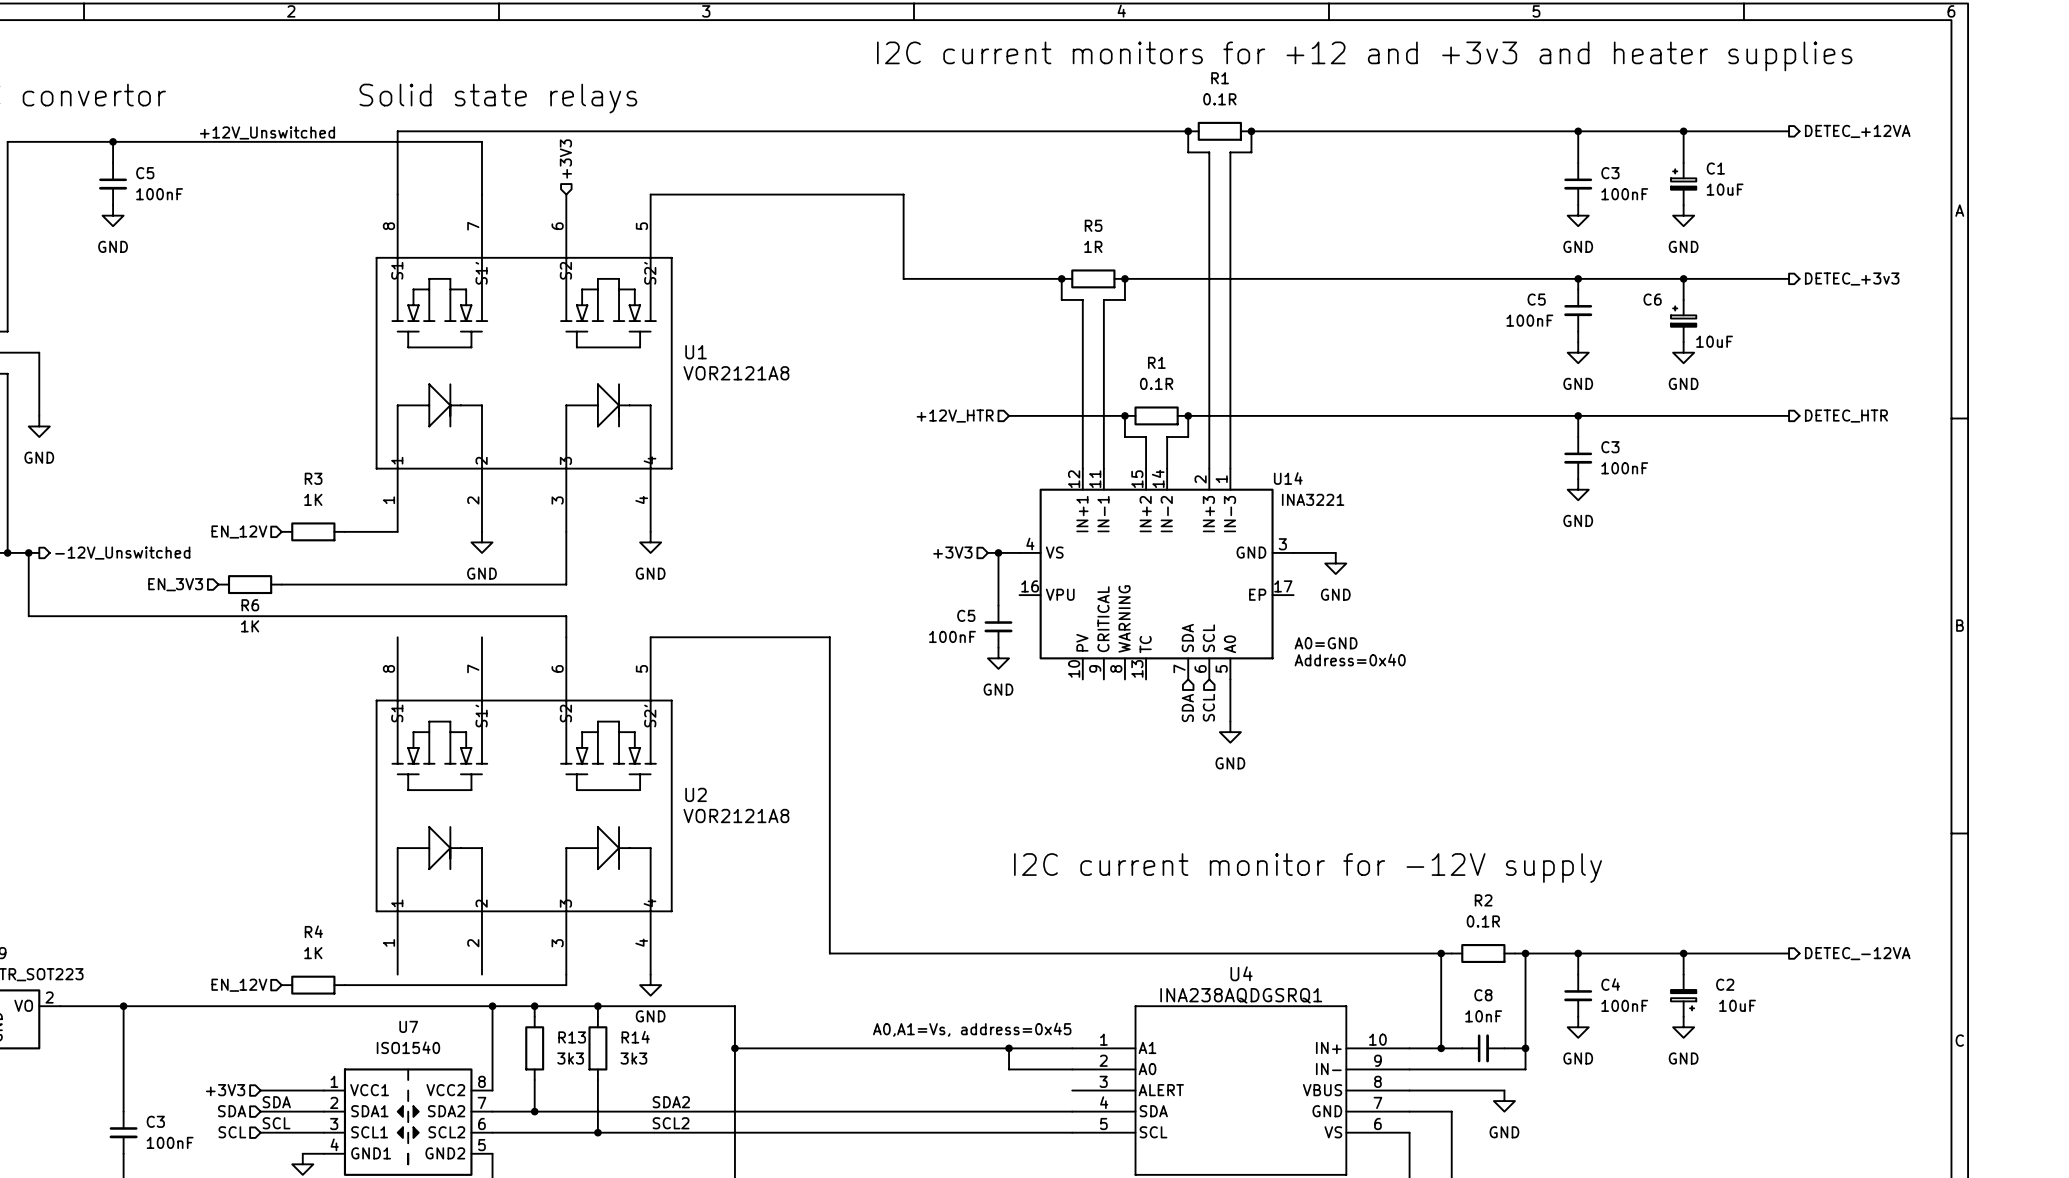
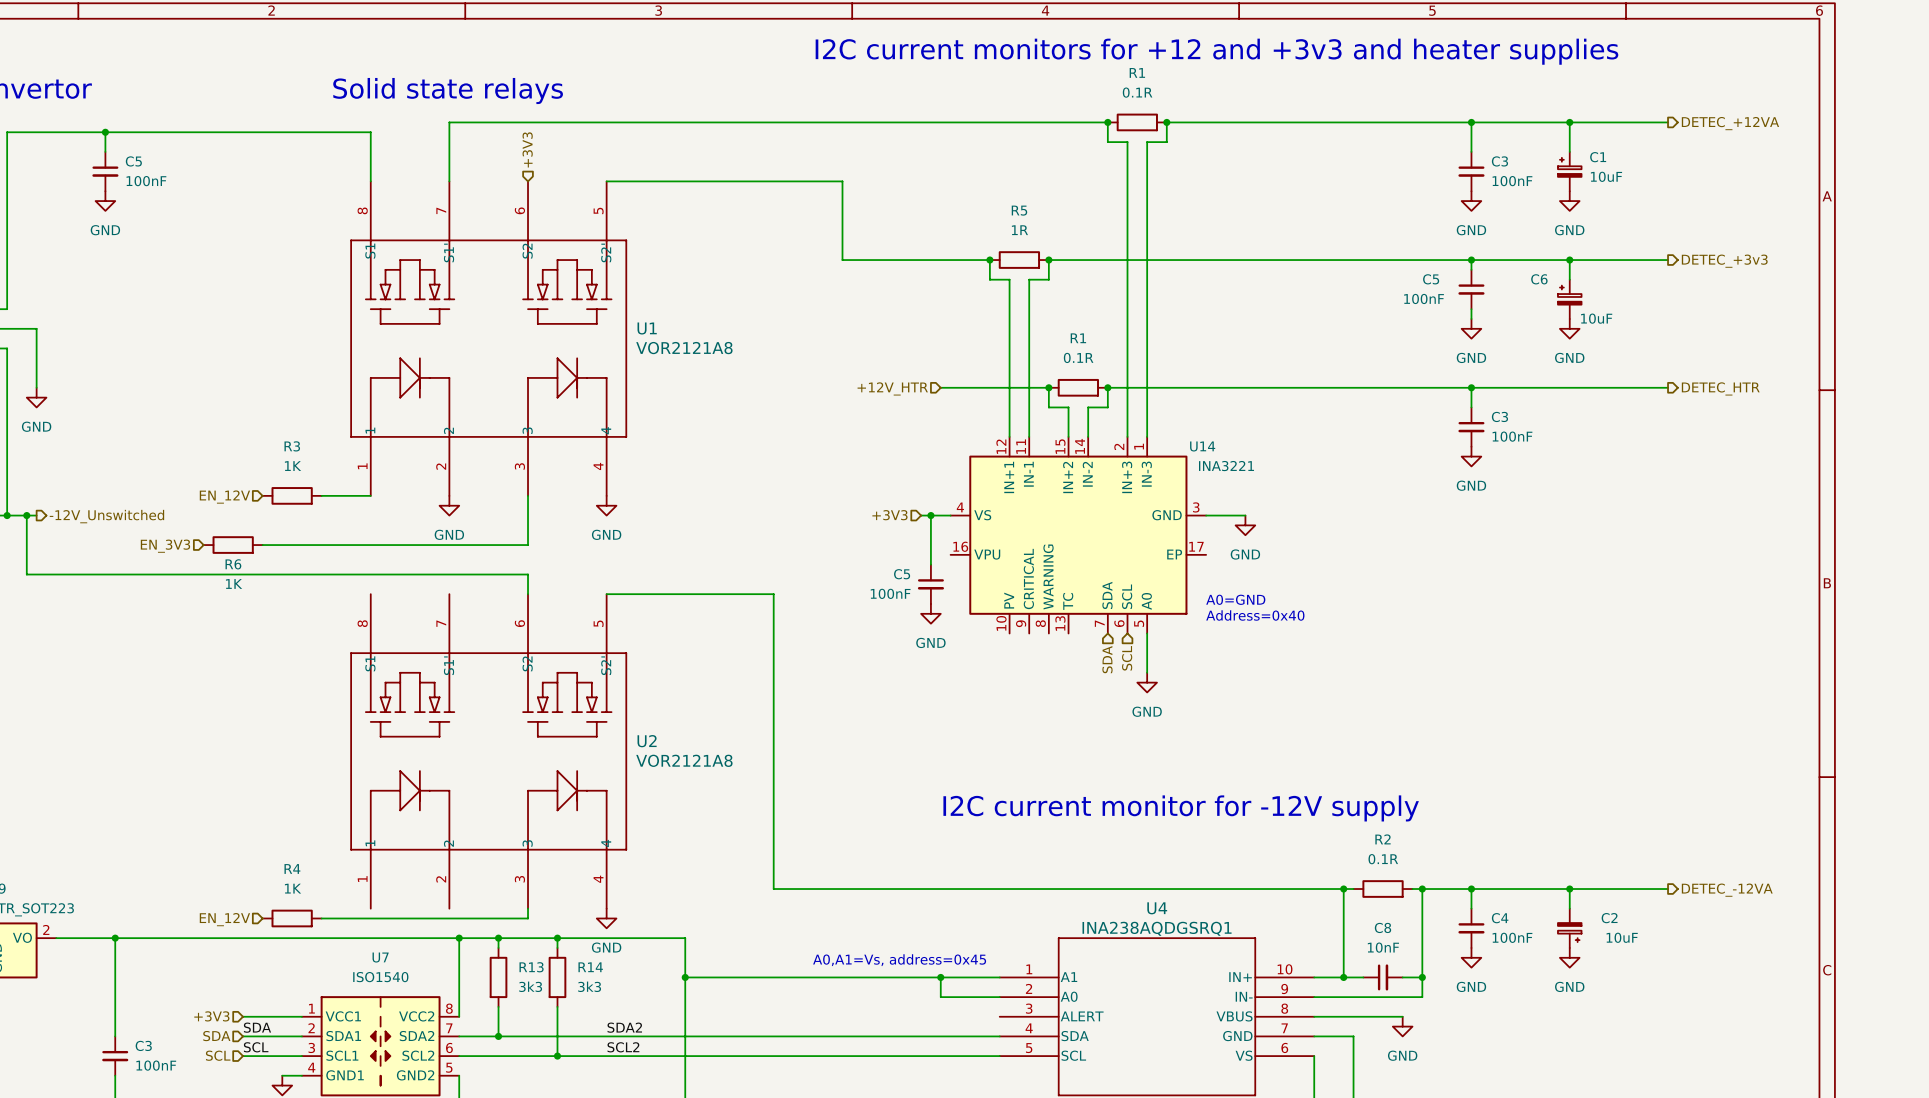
wire: (481, 131) (397, 131) (397, 141) (481, 141) -> (449, 122) (449, 132)
label: +12V_Unswitched (267, 132) -> none

